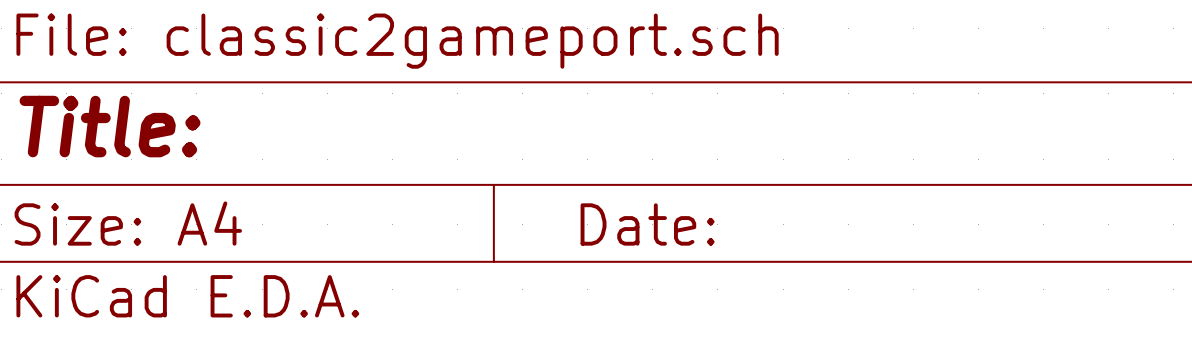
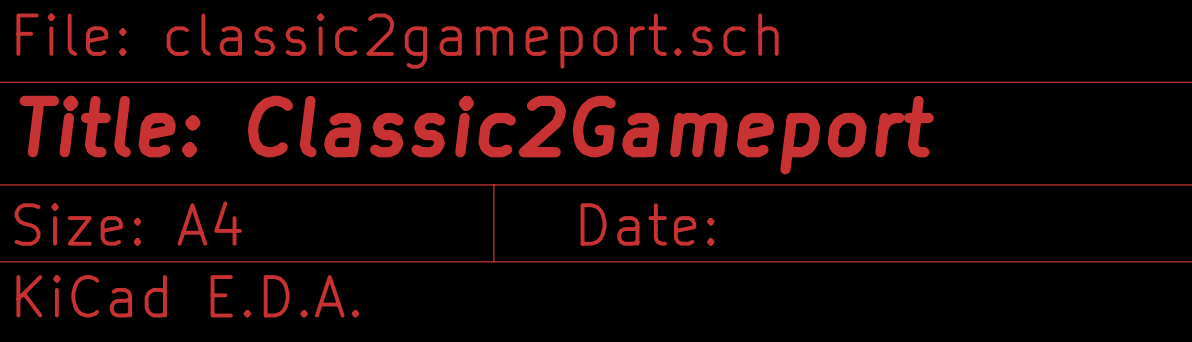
title block: Title: (110, 126) -> Title: Classic2Gameport (476, 135)

